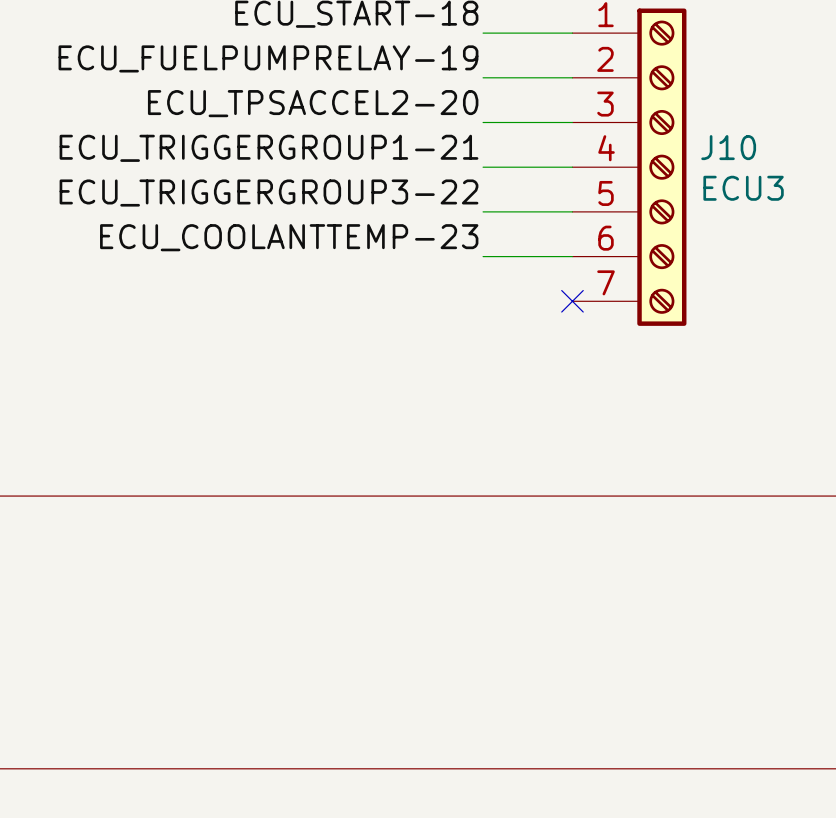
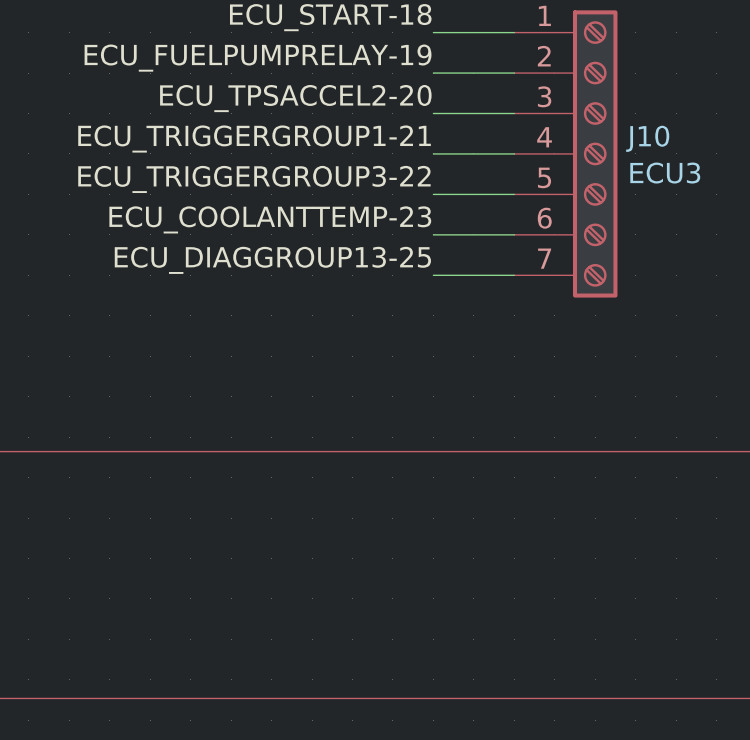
label: none -> ECU_DIAGGROUP13-25 (272, 260)
wire: none -> (433, 275) (514, 275)
no-connect mark: (572, 301) -> none

